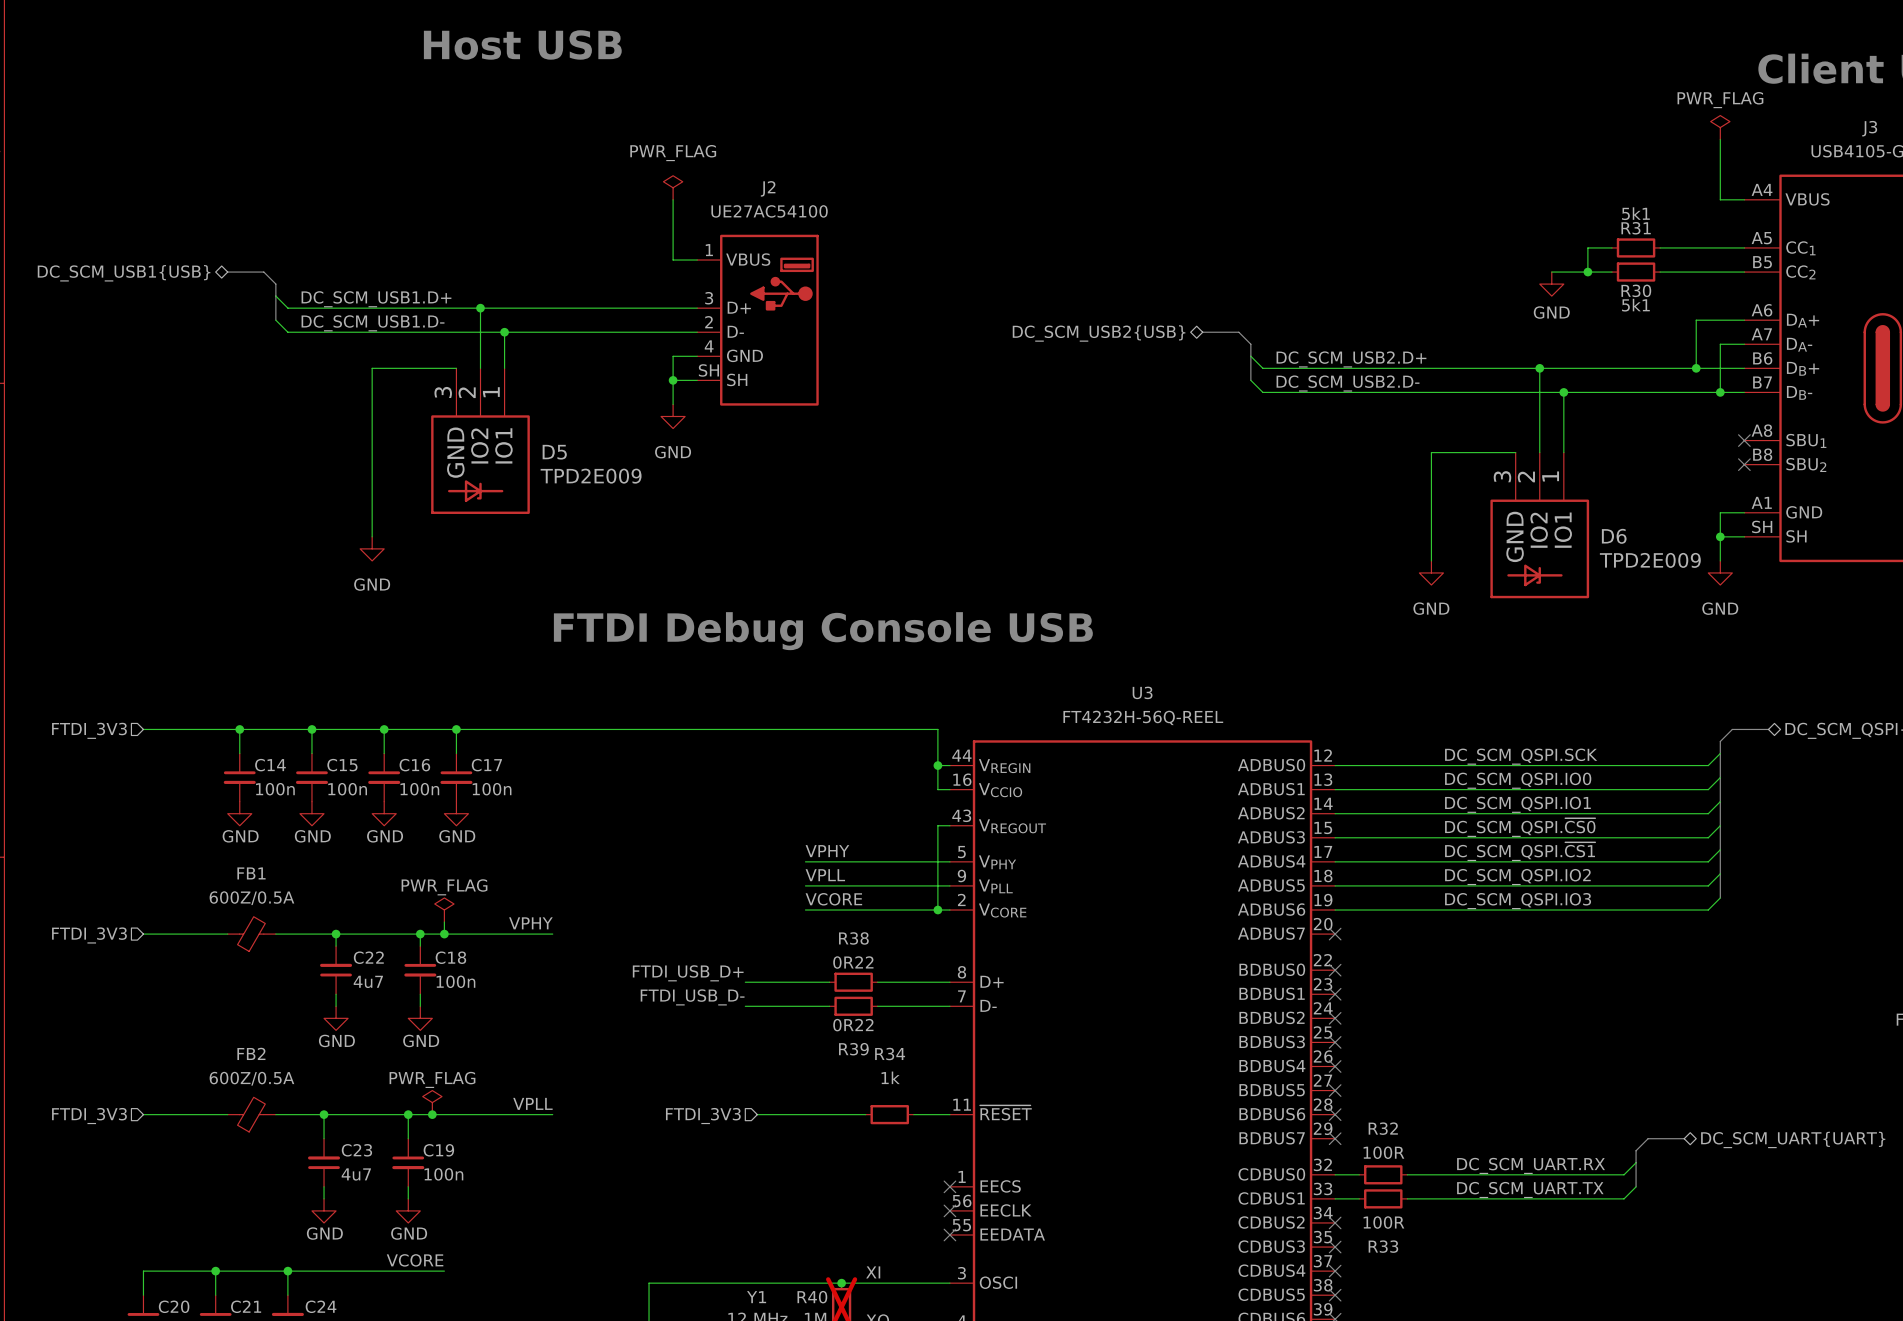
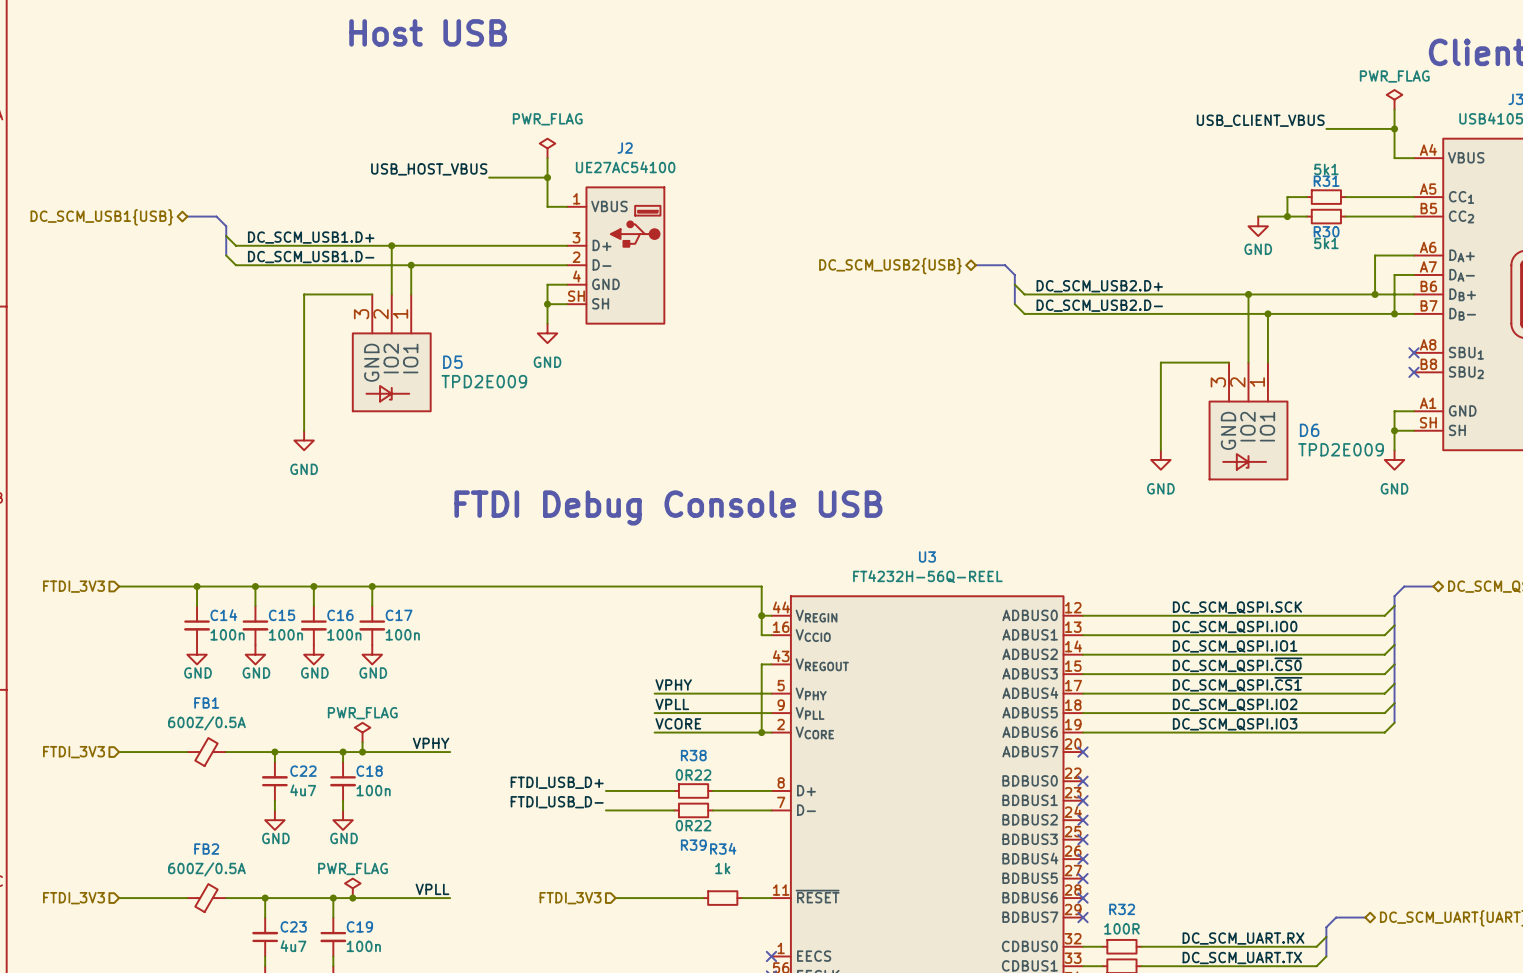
label: none -> USB_CLIENT_VBUS (1260, 120)
wire: none -> (1326, 128) (1394, 128)
junction: none -> (1394, 128)
label: none -> USB_HOST_VBUS (429, 169)
wire: none -> (489, 177) (547, 177)
junction: none -> (547, 177)

